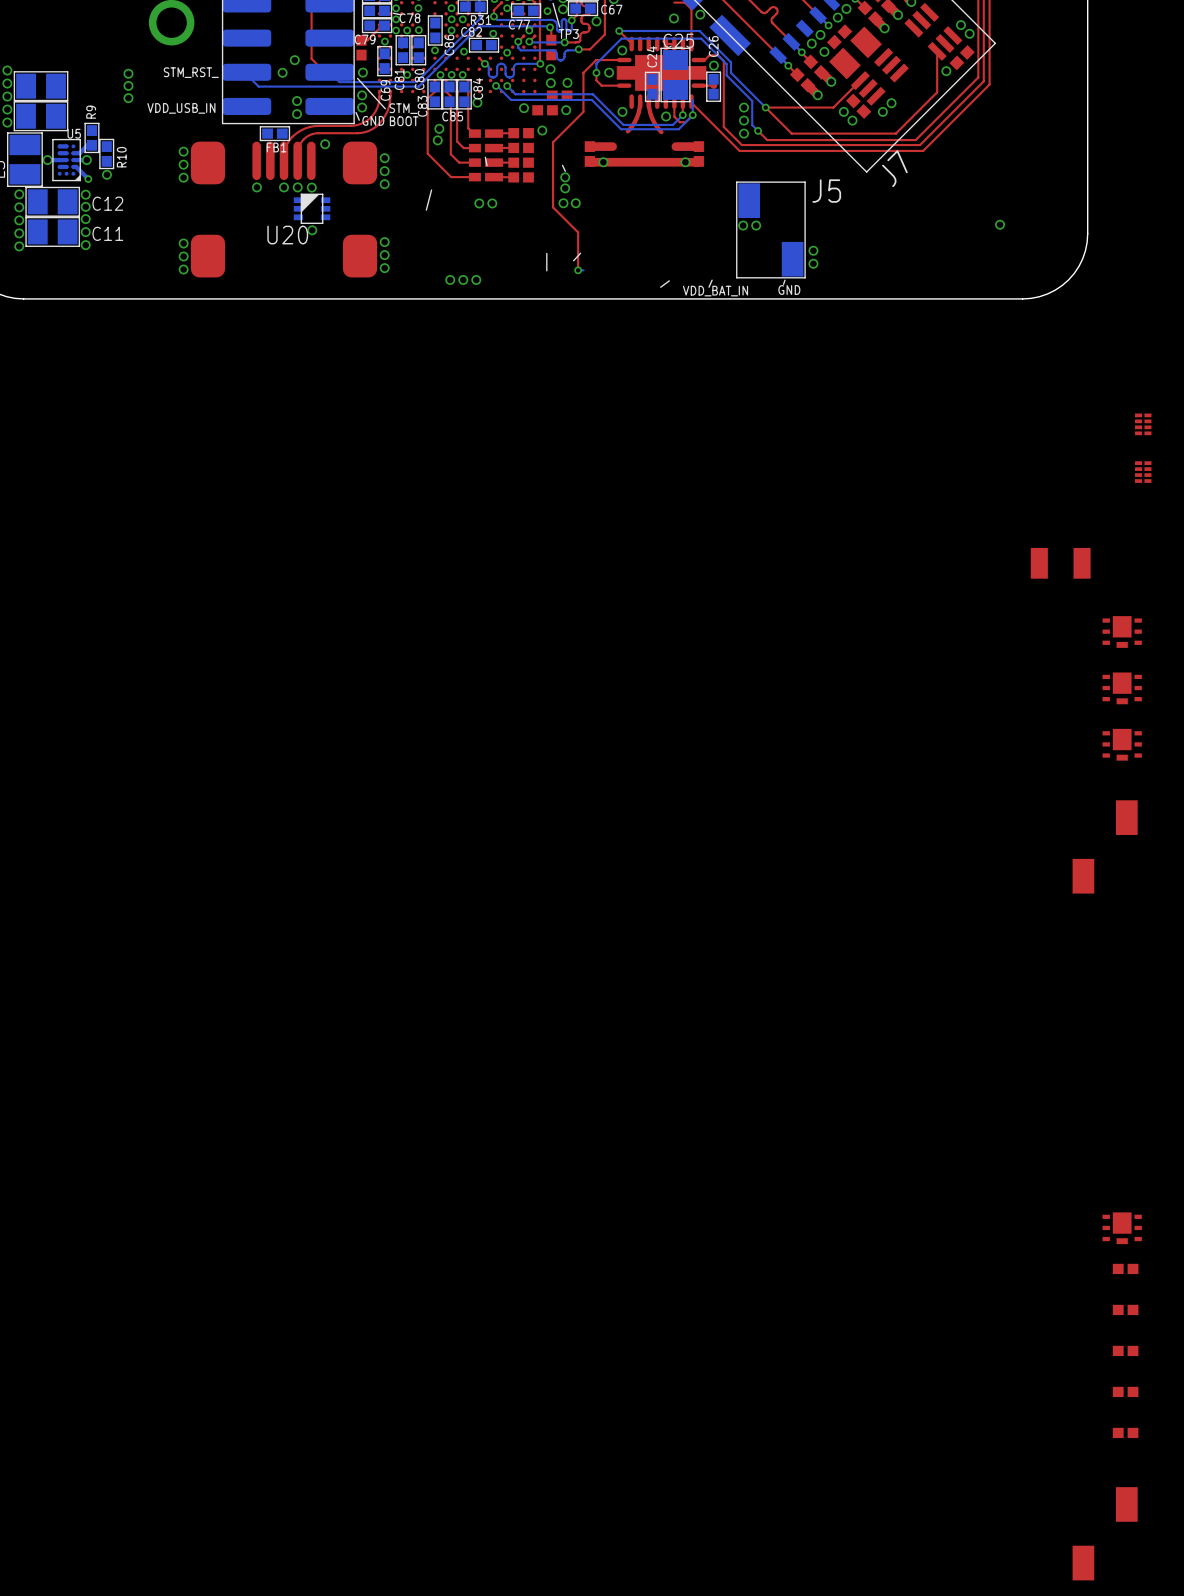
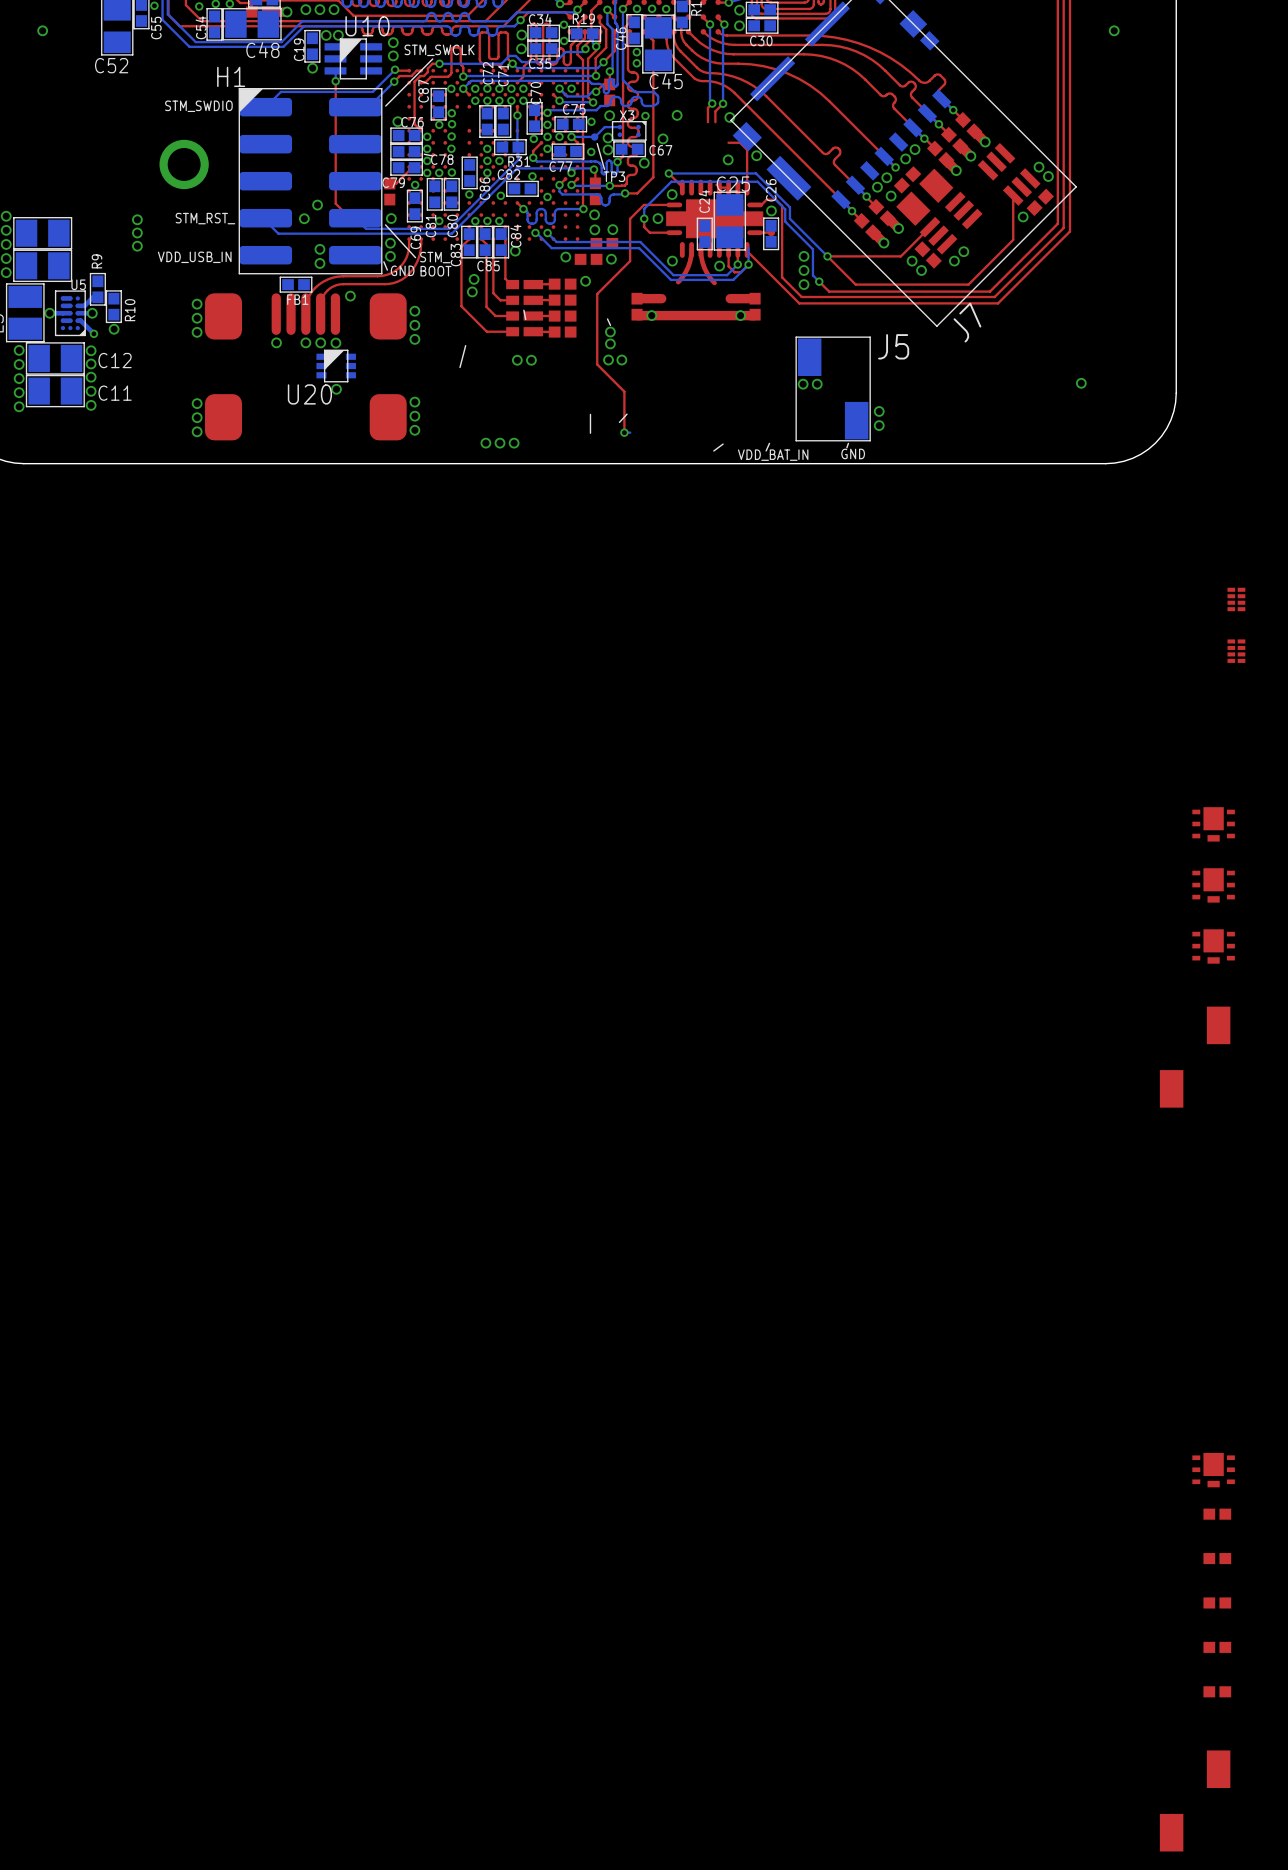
part: (1060, 563) -> none

